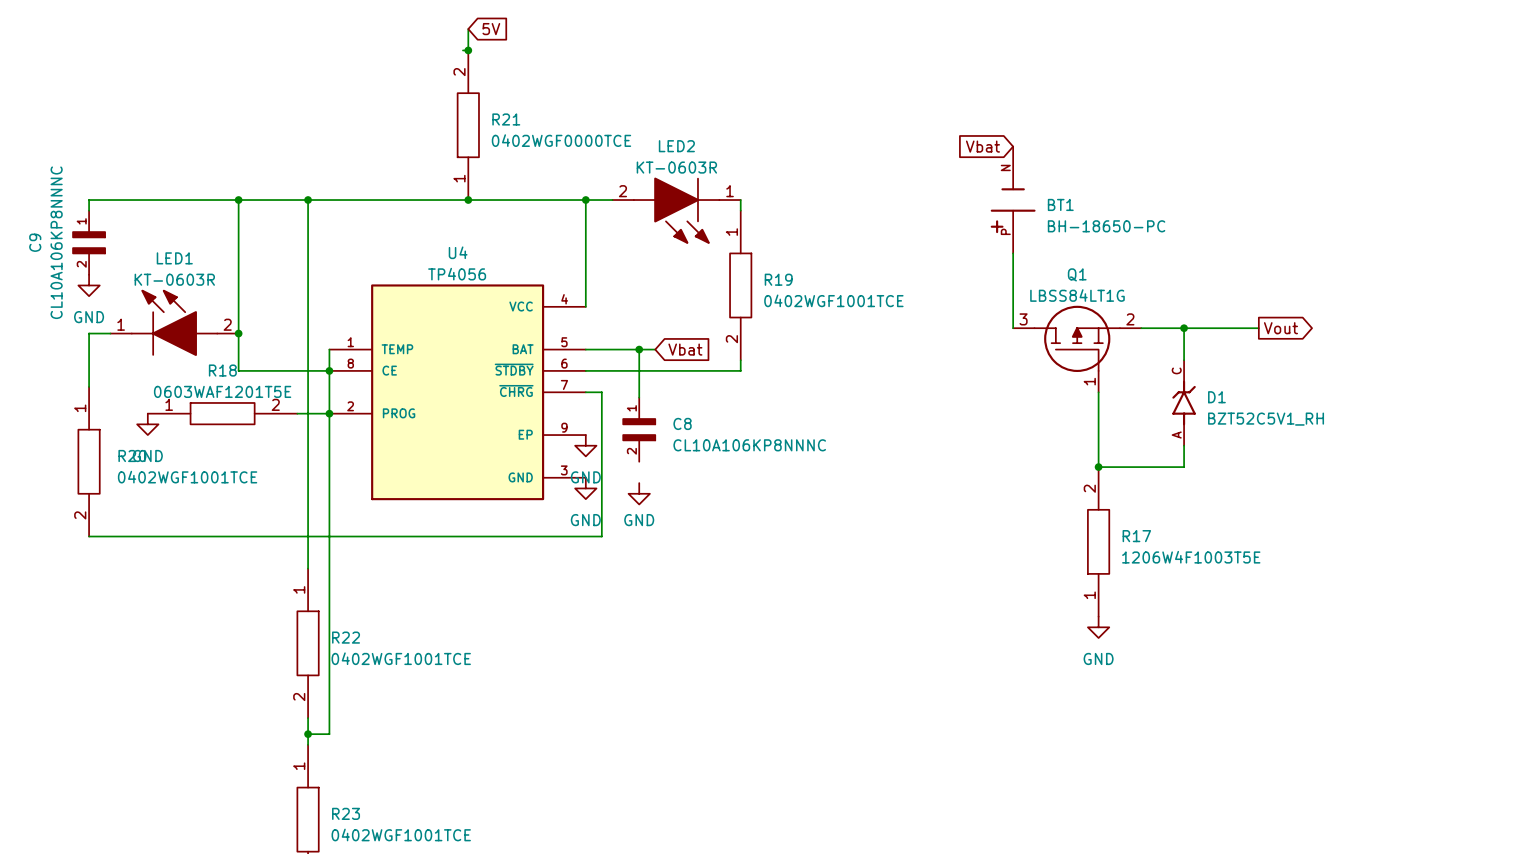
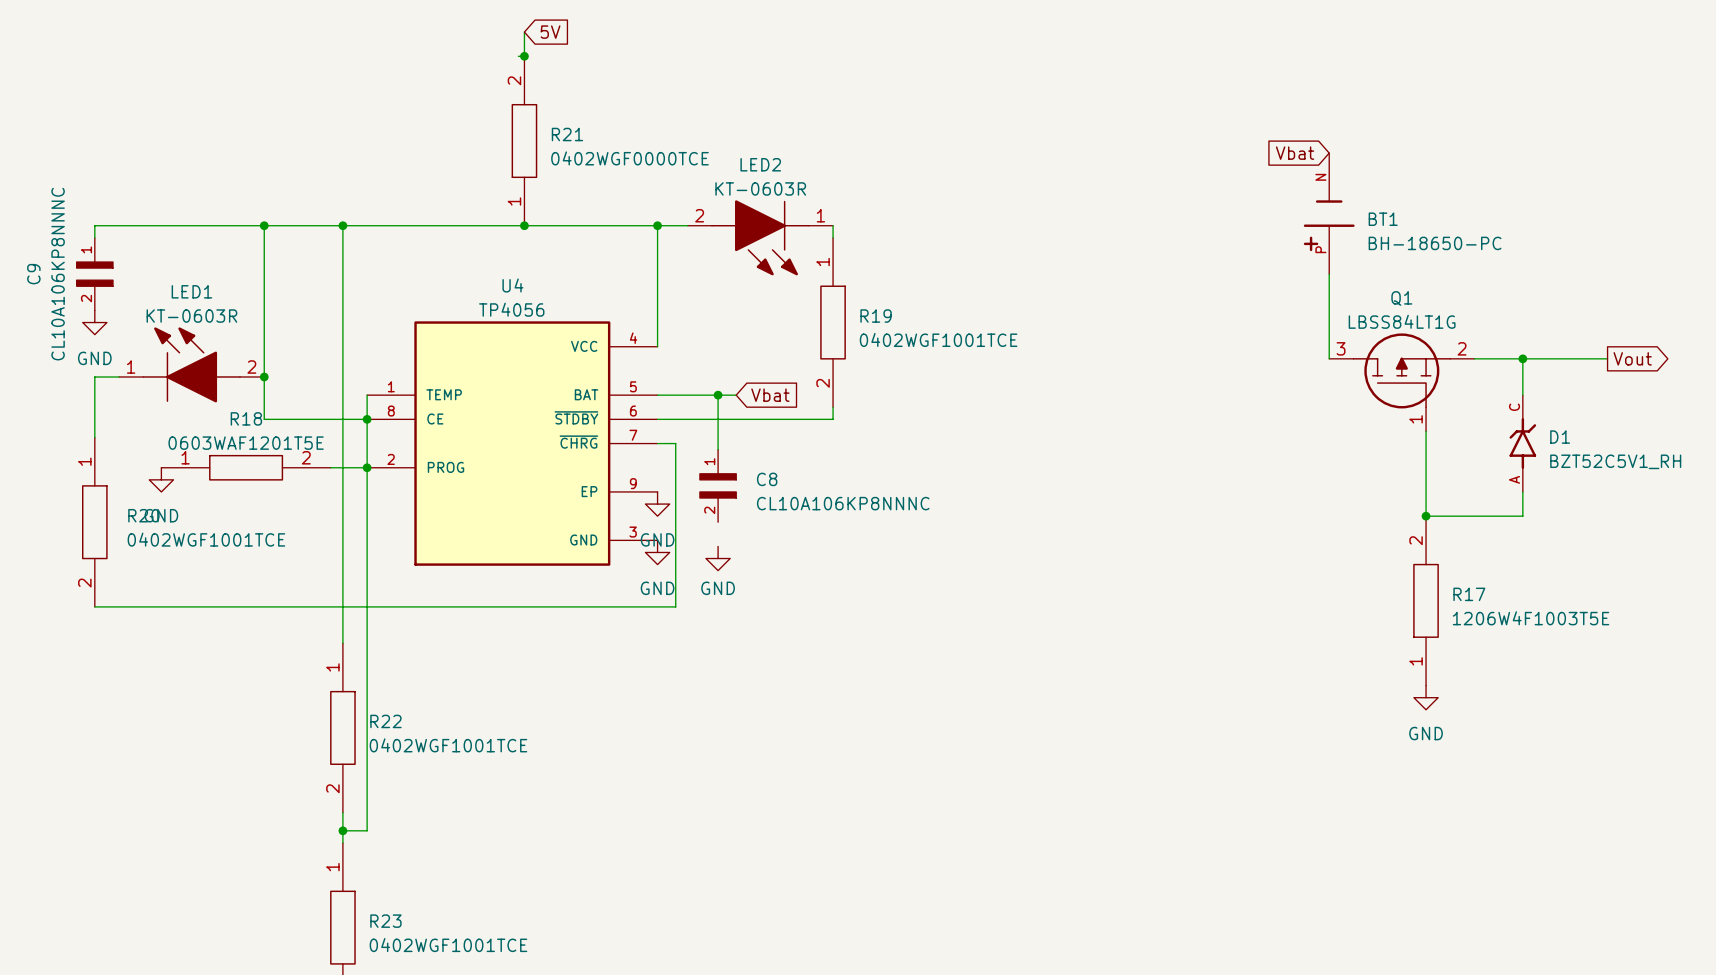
global label position: Vbat (982, 146) -> Vbat (1295, 153)
BT1 position: (1013, 200) -> (1329, 213)
wire: (1013, 253) (1013, 328) -> (1329, 274) (1329, 358)
junction: none -> (1522, 358)
wire: (1141, 328) (1258, 328) -> (1474, 358) (1607, 358)
wire: (1184, 328) (1184, 360) -> (1522, 358) (1522, 395)
junction: (1184, 328) -> none
global label position: Vout (1280, 328) -> Vout (1632, 358)
Q1 position: (1077, 349) -> (1401, 382)
wire: (1098, 392) (1098, 467) (1184, 467) (1184, 445) -> (1426, 431) (1426, 516) (1522, 516) (1522, 491)
D1 position: (1184, 402) -> (1522, 443)
junction: none -> (1426, 516)
junction: (1098, 467) -> none
R17 position: (1098, 541) -> (1426, 600)
power symbol position: GND (1098, 627) -> GND (1426, 697)

